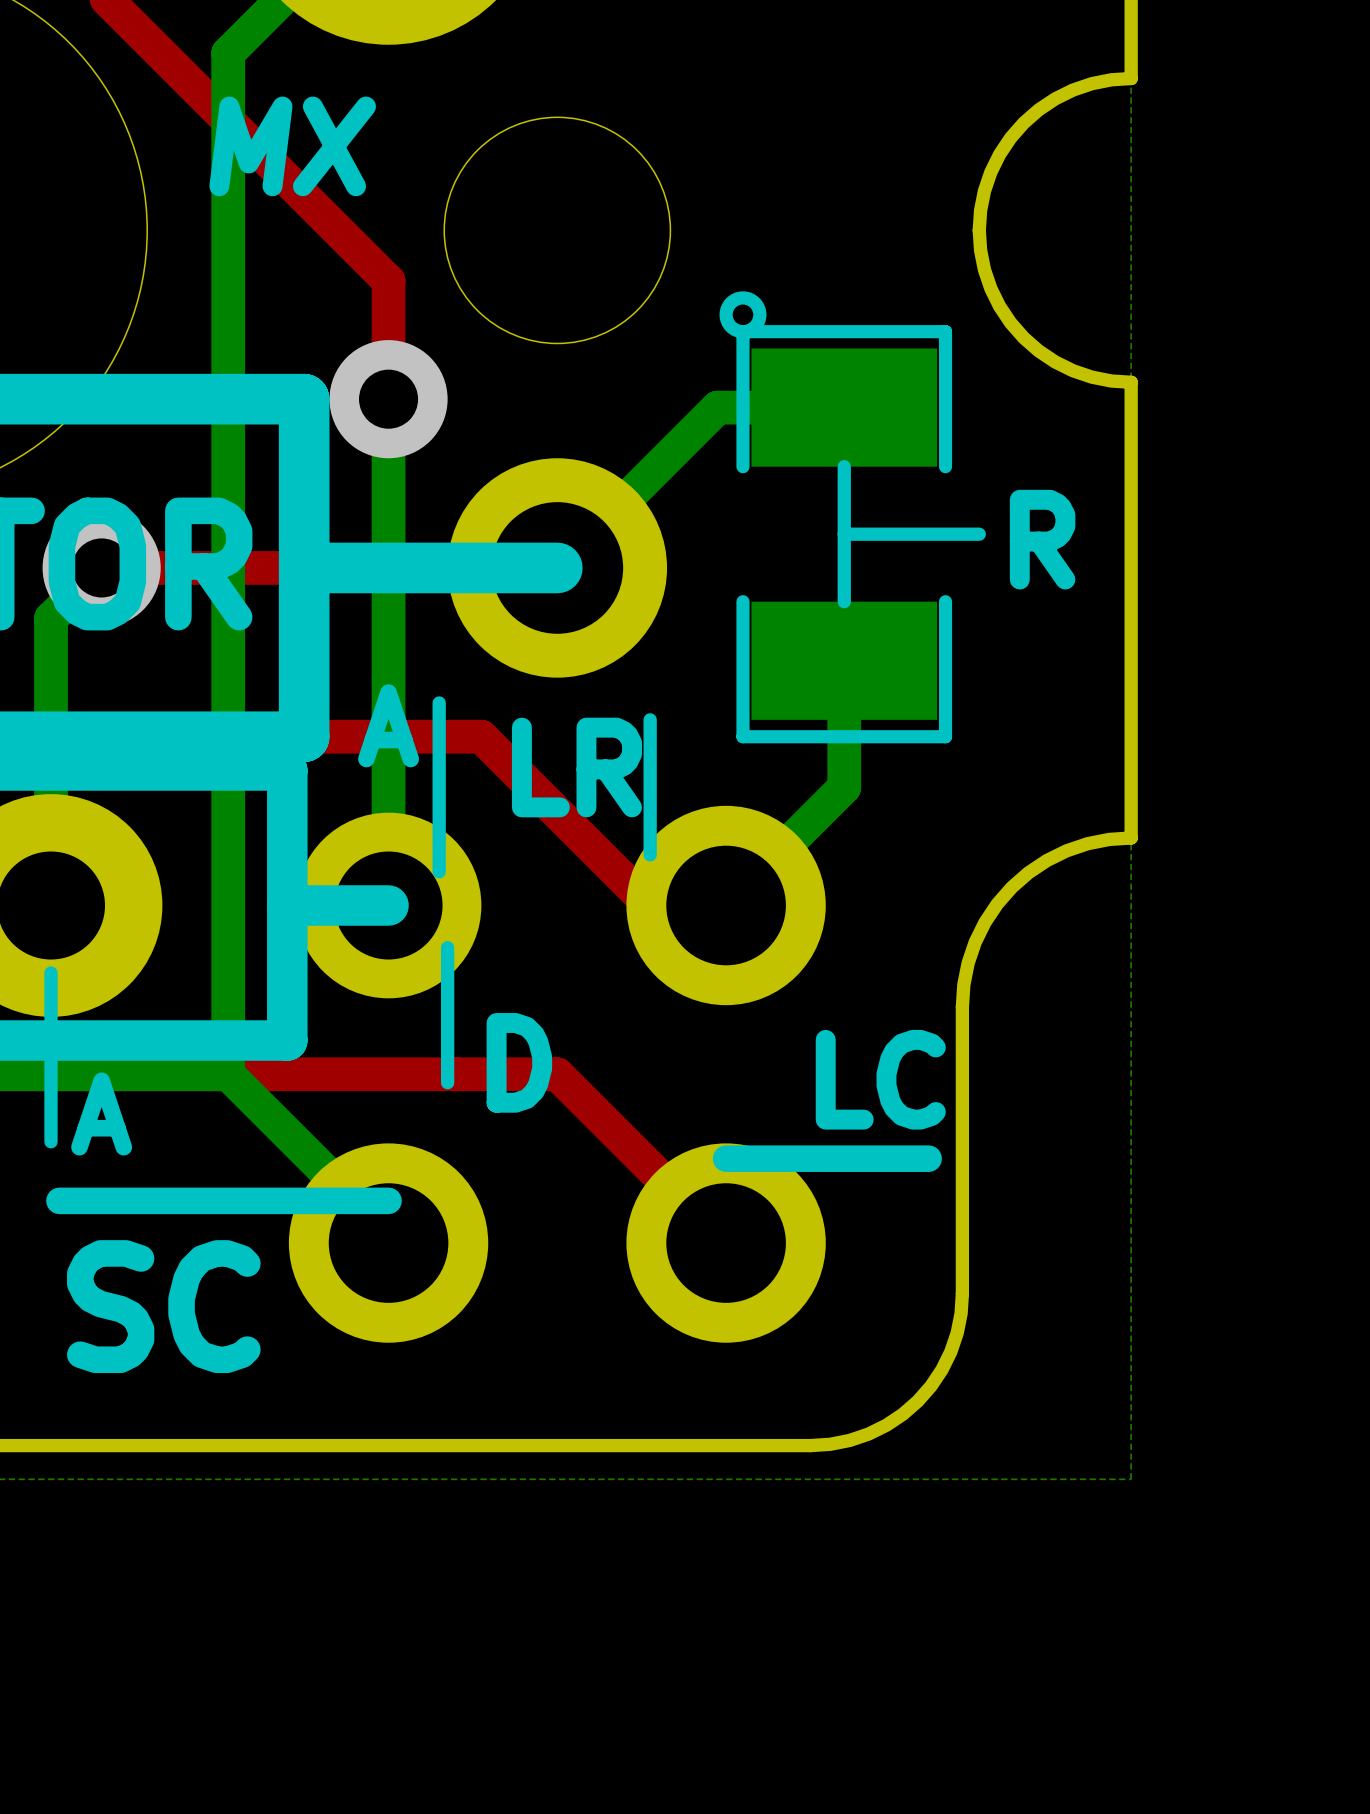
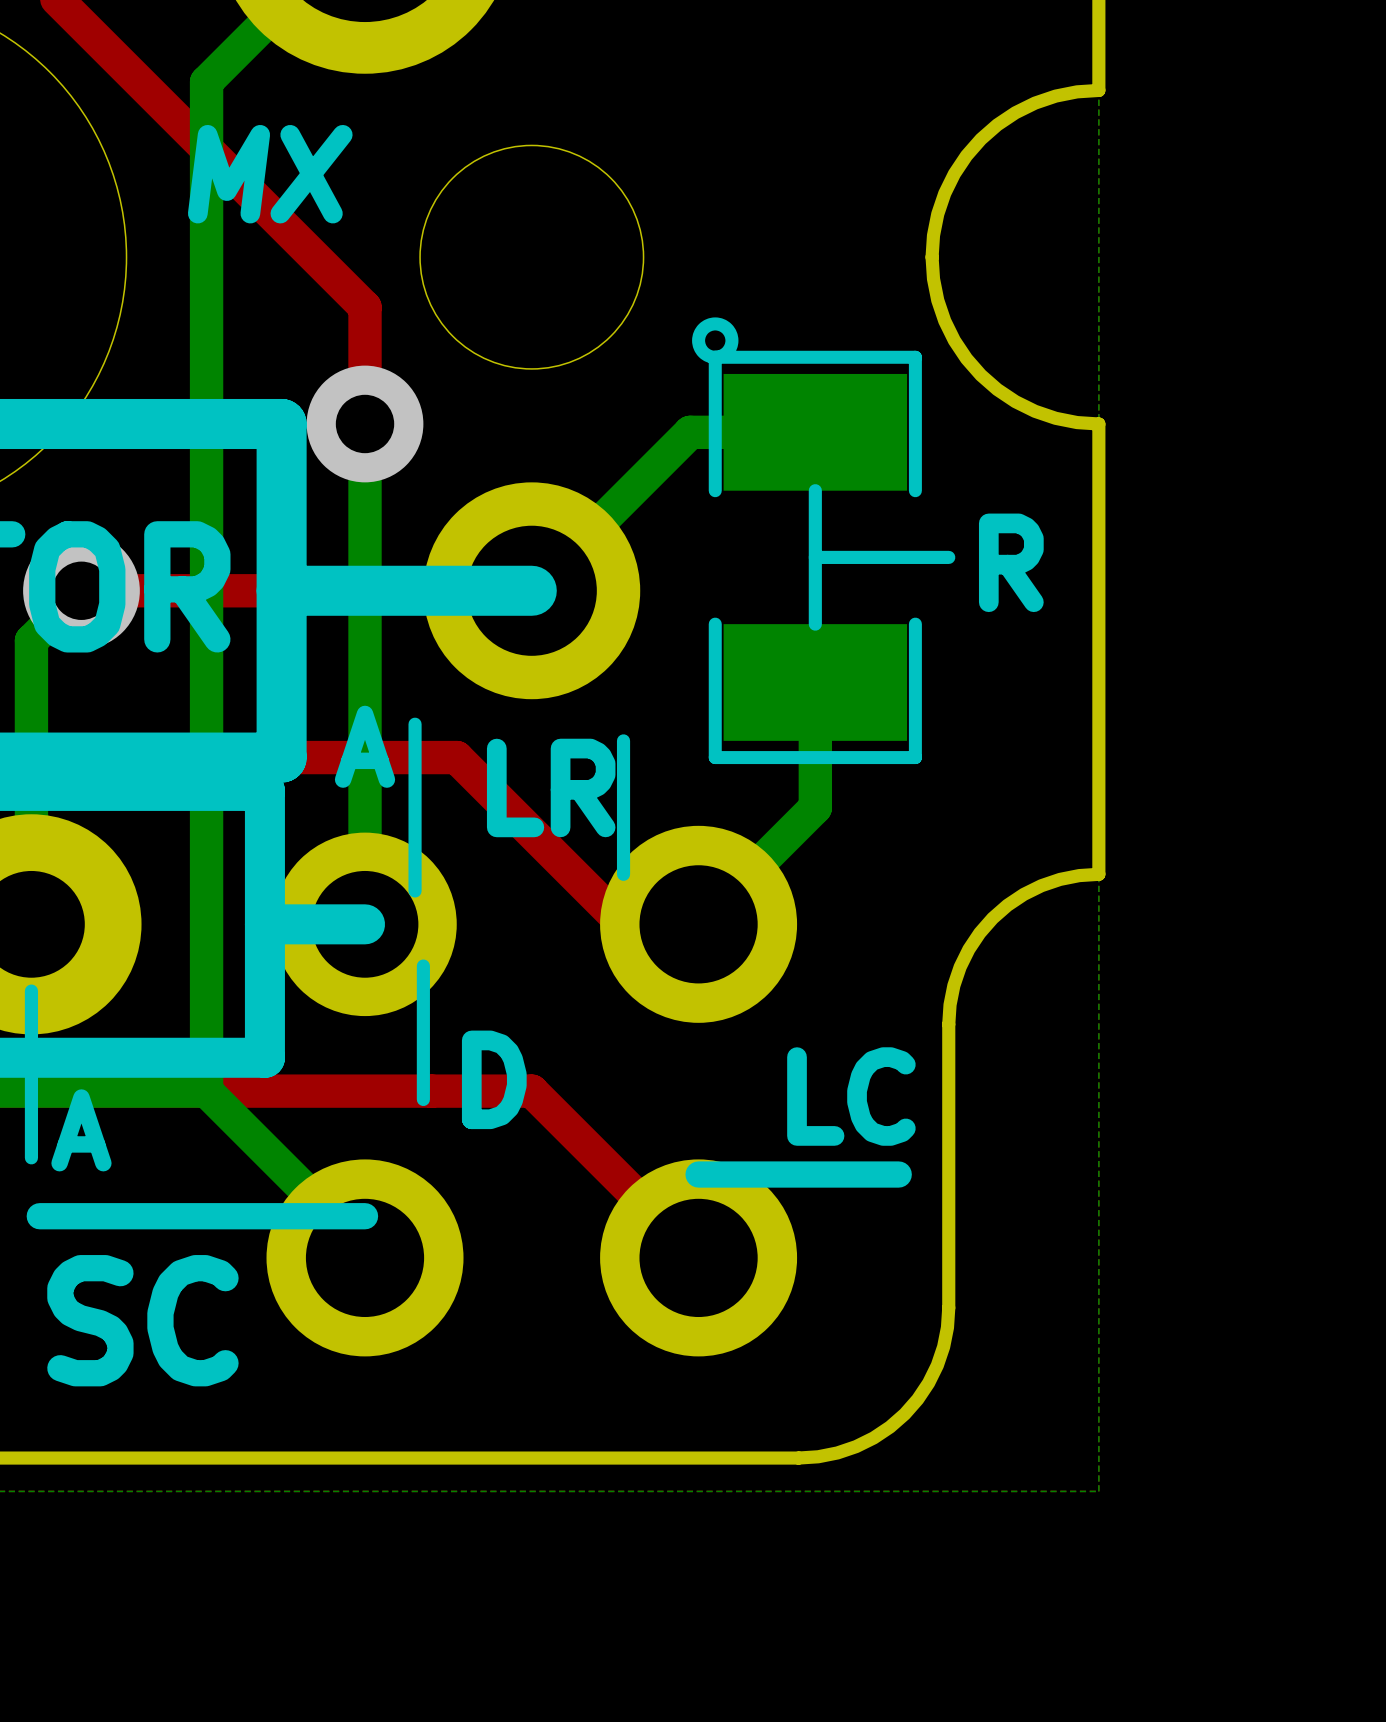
board edge: (1131, 61) (1131, 78) (1091, 83) (1073, 90) (1038, 109) (1023, 122) (999, 154) (990, 172) (984, 191) (979, 230) (984, 269) (990, 288) (999, 306) (1023, 337) (1055, 361) (1073, 370) (1091, 377) (1131, 382) (1131, 399) -> (1098, 90) (1077, 91) (1035, 103) (1015, 112) (980, 139) (954, 173) (944, 193) (937, 214) (932, 257) (933, 278) (944, 321) (954, 340) (980, 375) (1015, 401) (1035, 411) (1077, 422) (1098, 423)
board edge: (1131, 837) (1087, 843) (1046, 860) (1011, 887) (985, 922) (968, 963) (963, 984) (962, 1293) (957, 1333) (942, 1369) (917, 1401) (902, 1414) (868, 1434) (849, 1440) (810, 1445) -> (1098, 857) (1098, 874) (1060, 879) (1041, 885) (1007, 905) (992, 918) (968, 949) (953, 985) (948, 1024) (948, 1307) (943, 1346) (928, 1383) (904, 1414) (873, 1437) (837, 1452) (818, 1456) (781, 1458)

